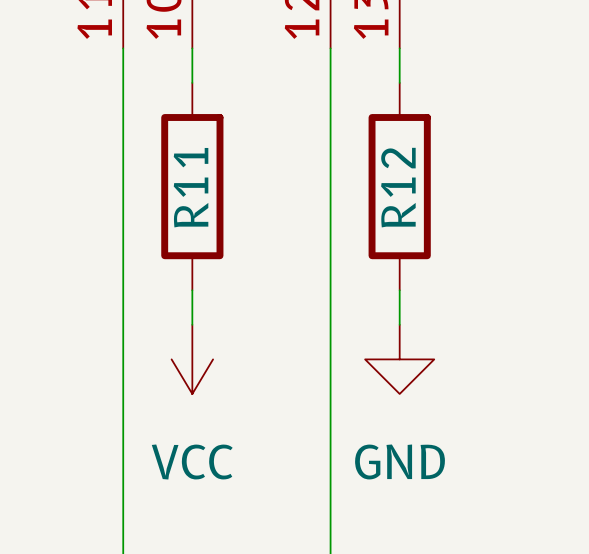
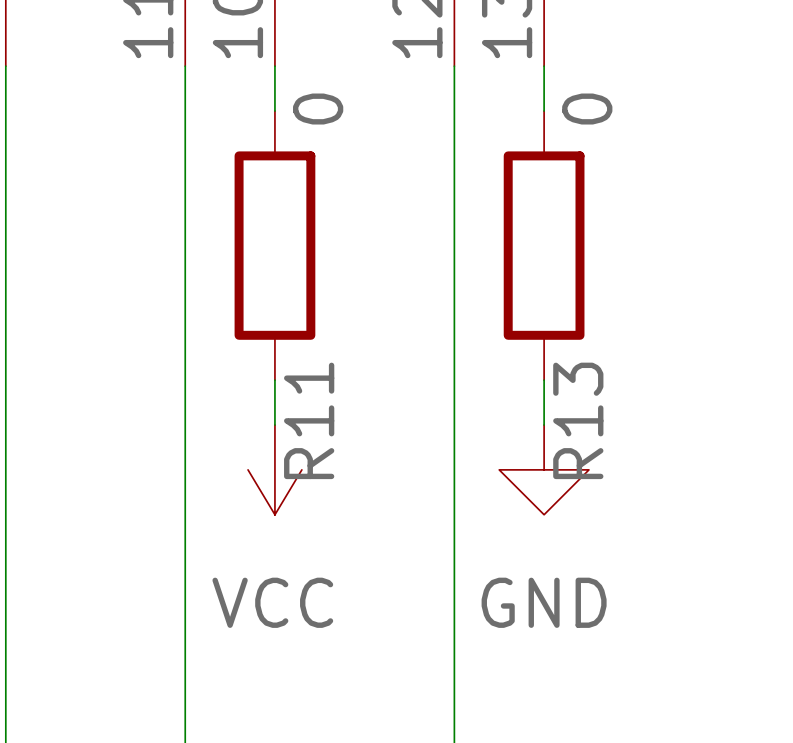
R11 value: none -> 0 (318, 109)
R12 value: none -> 0 (587, 109)
R11 name position: R11 (191, 187) -> R11 (309, 420)
R12 name: R12 (398, 187) -> R13 (578, 420)

